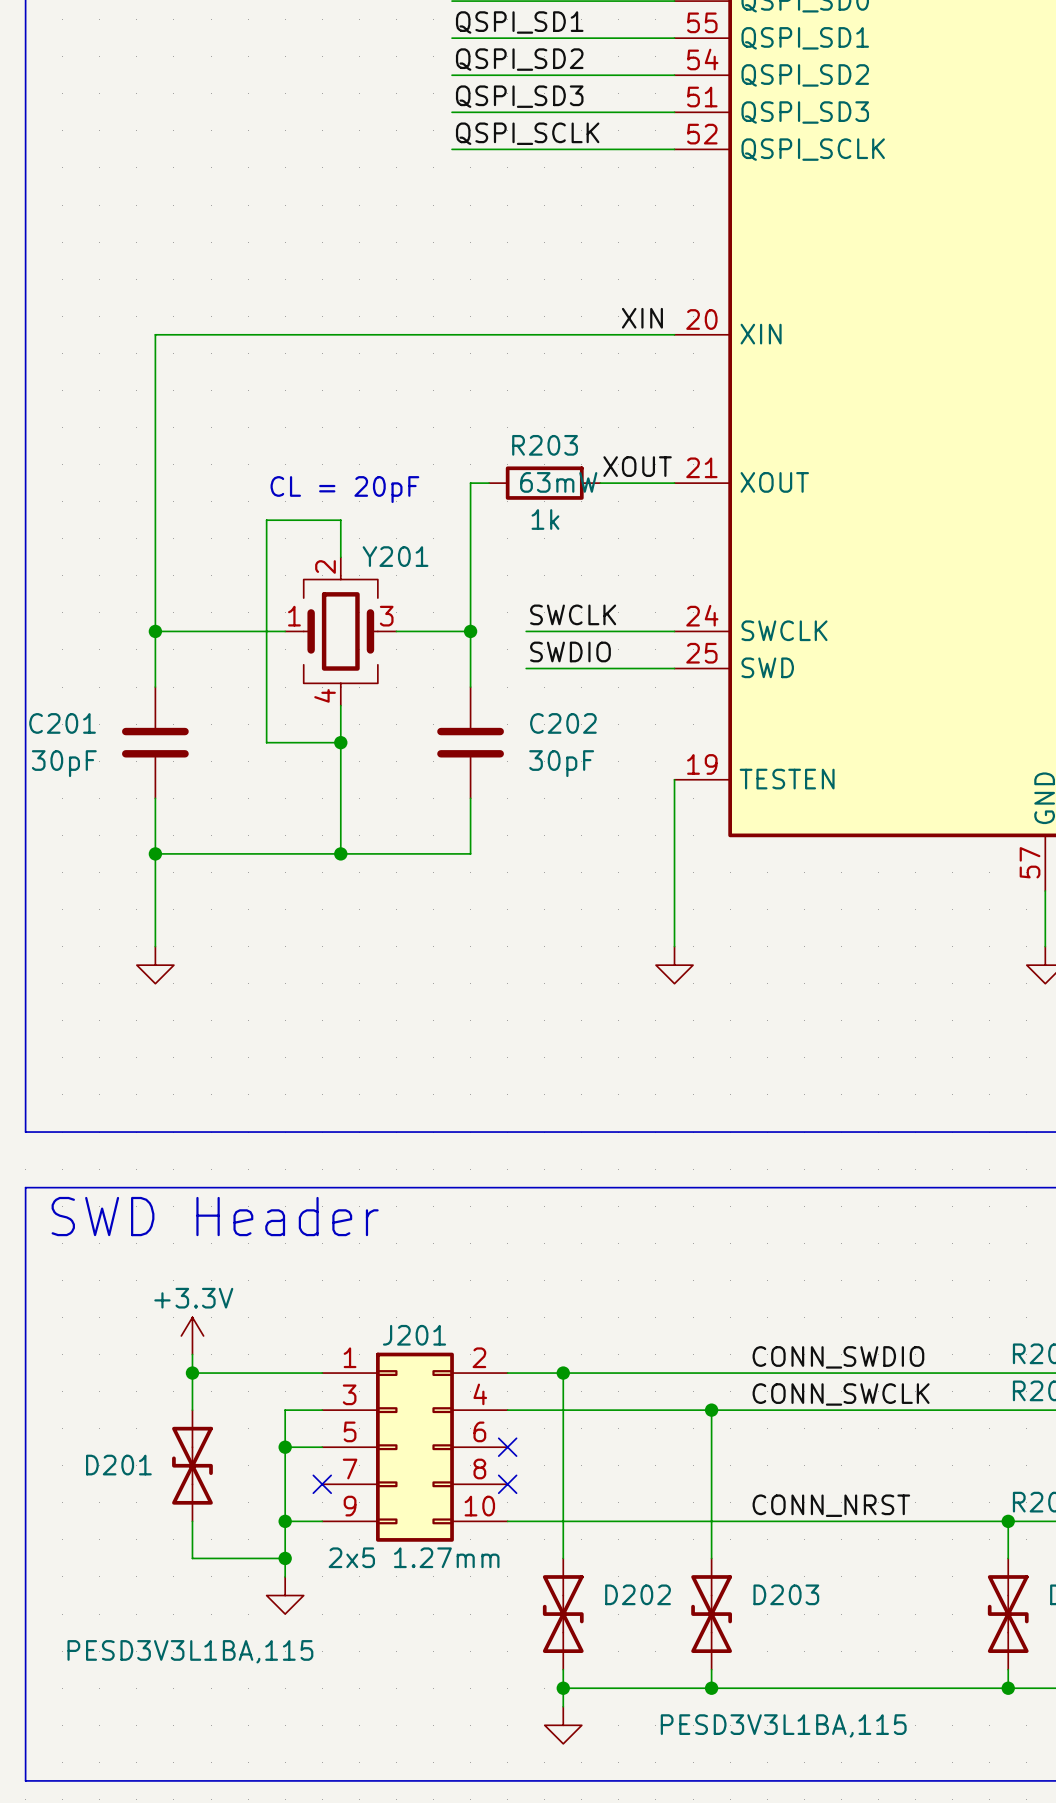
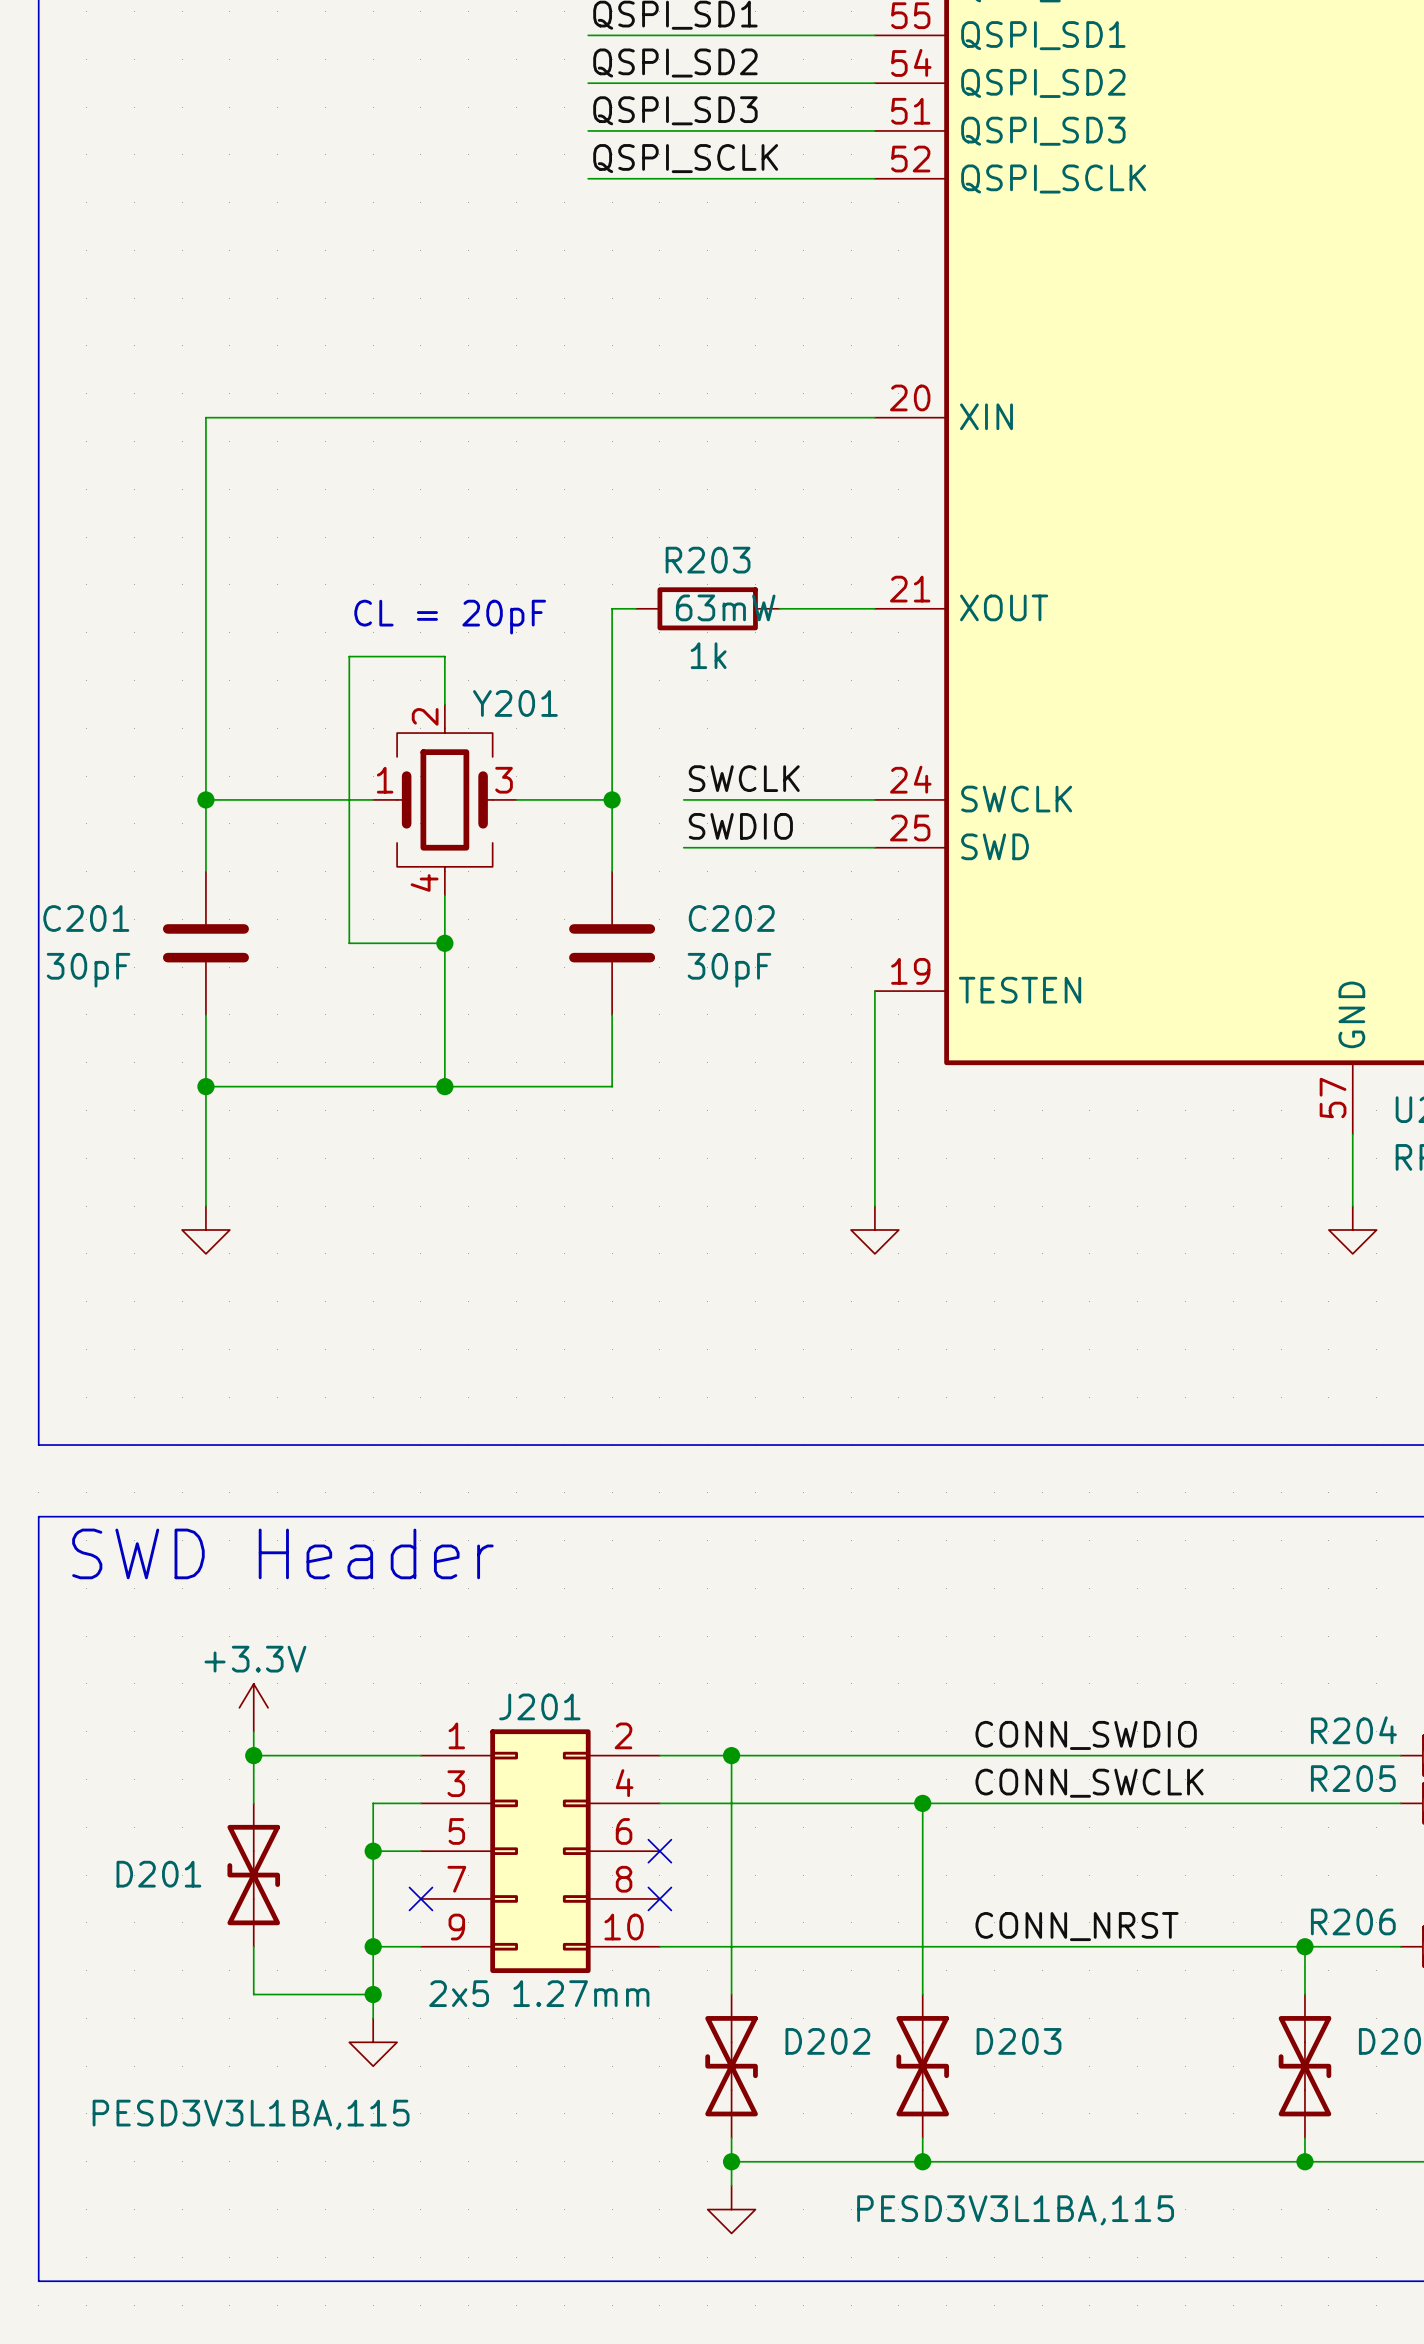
label: XIN (642, 318) -> none
label: XOUT (637, 466) -> none

